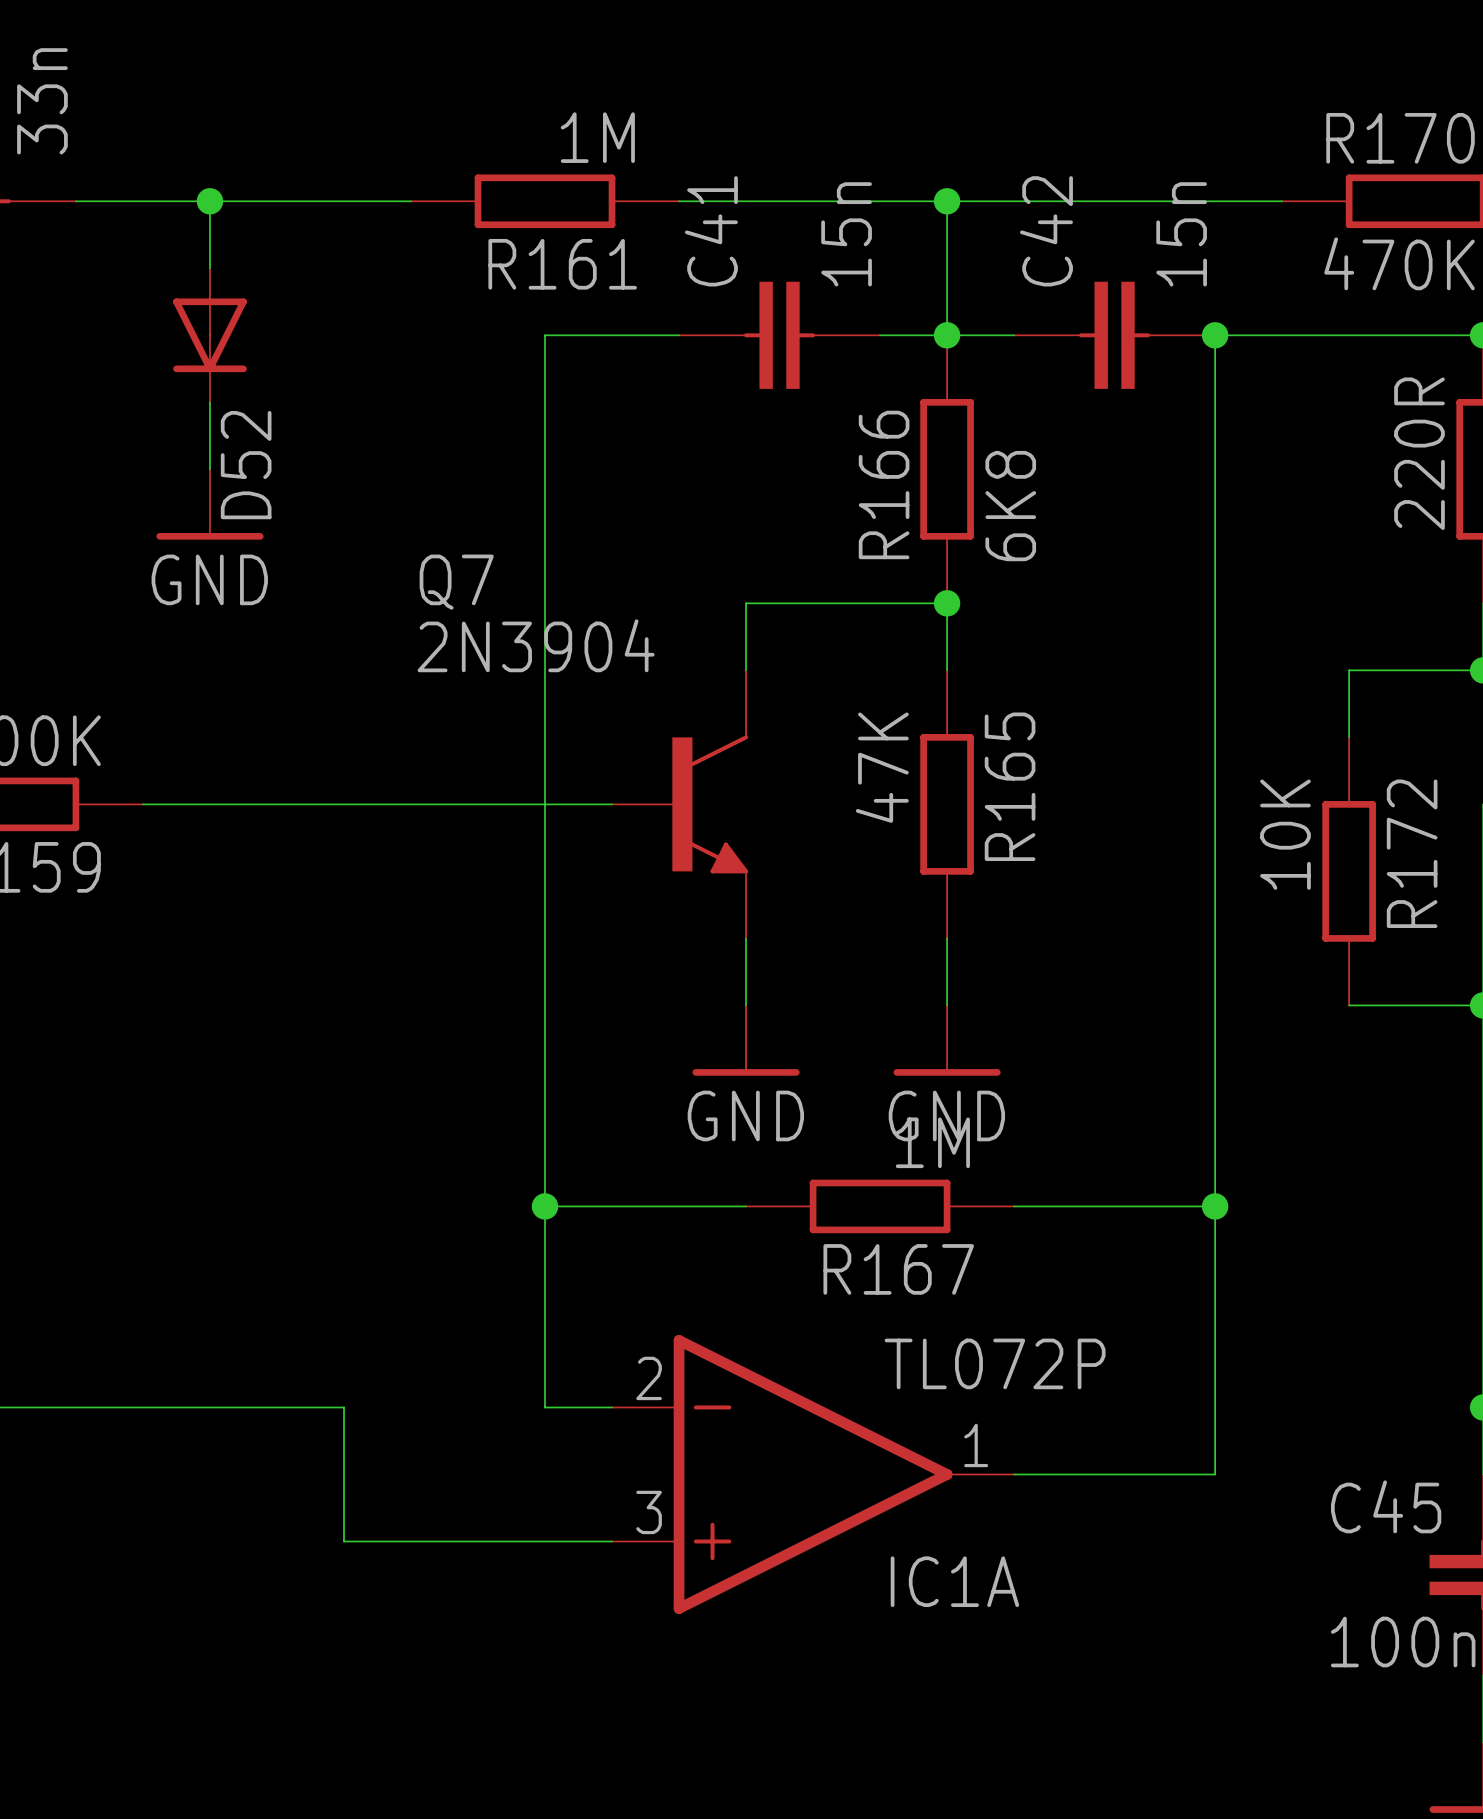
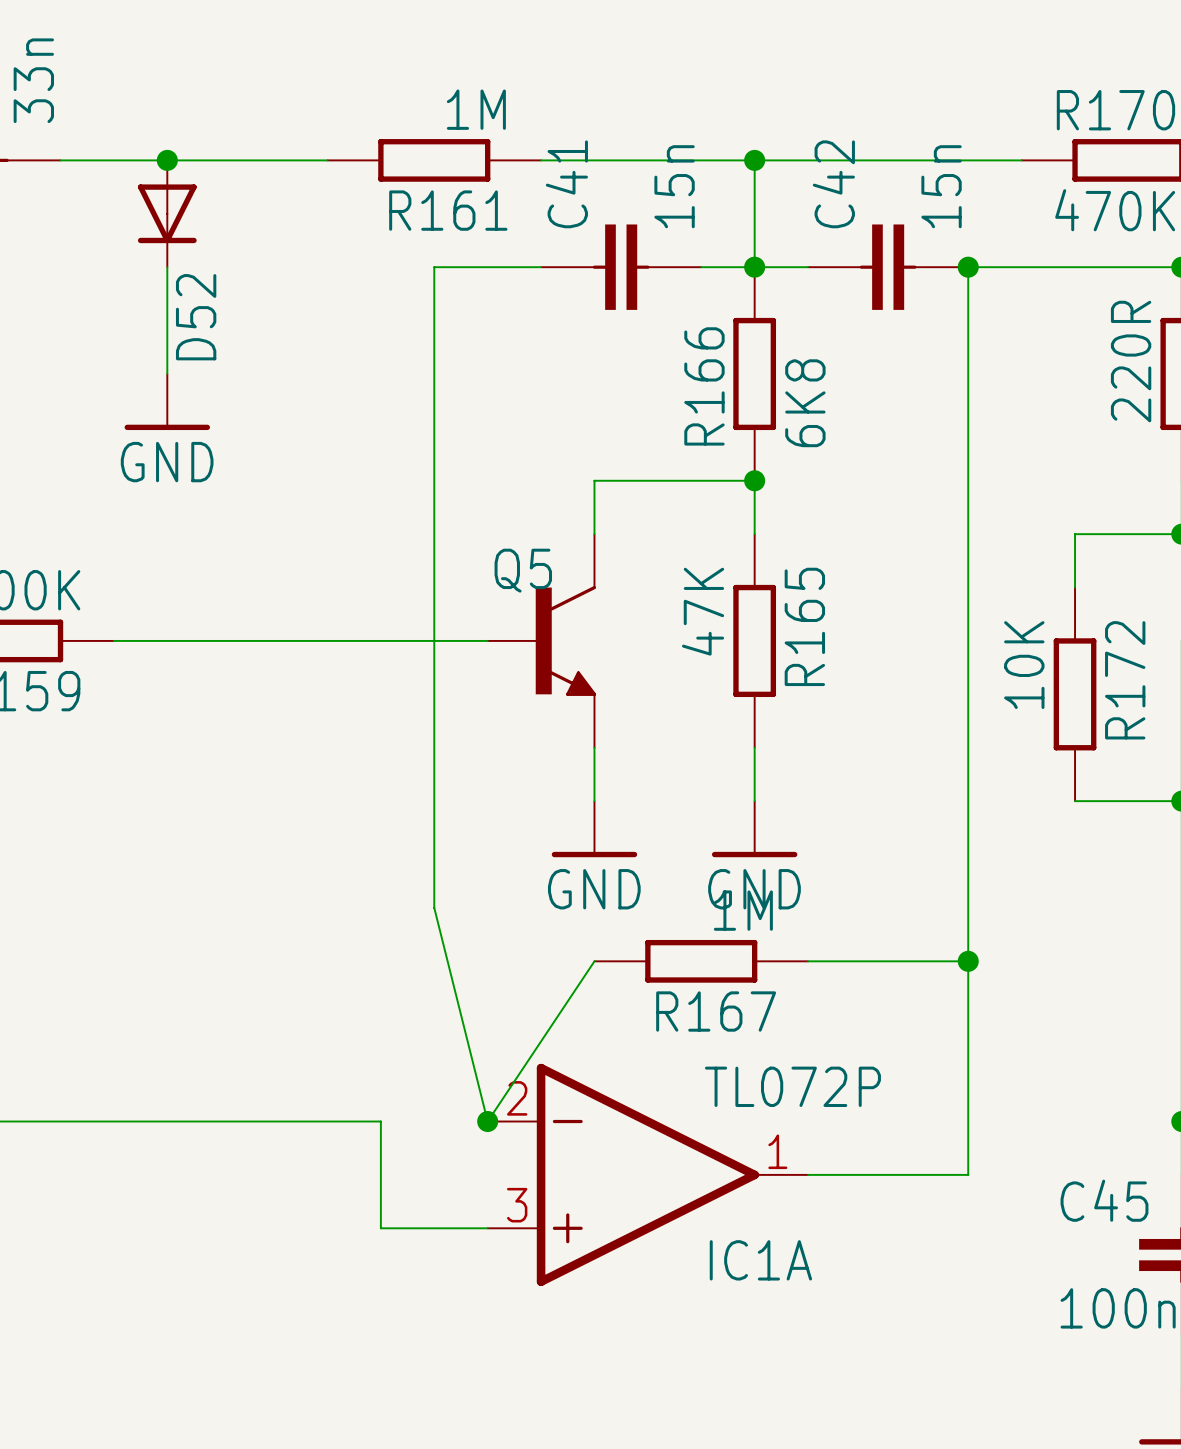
D52 position: (209, 335) -> (167, 213)
Q7 name: Q7 (456, 582) -> Q5 (523, 570)
Q7 value: 2N3904 (536, 645) -> none
wire: (545, 1139) (545, 1407) (612, 1407) -> none
wire: (545, 1206) (746, 1206) -> (434, 907) (487, 1121) (594, 961)
junction: (545, 1206) -> none
wire: (343, 1407) (343, 1541) (478, 1541) -> (274, 1121) (380, 1121) (380, 1228)
junction: none -> (487, 1121)

